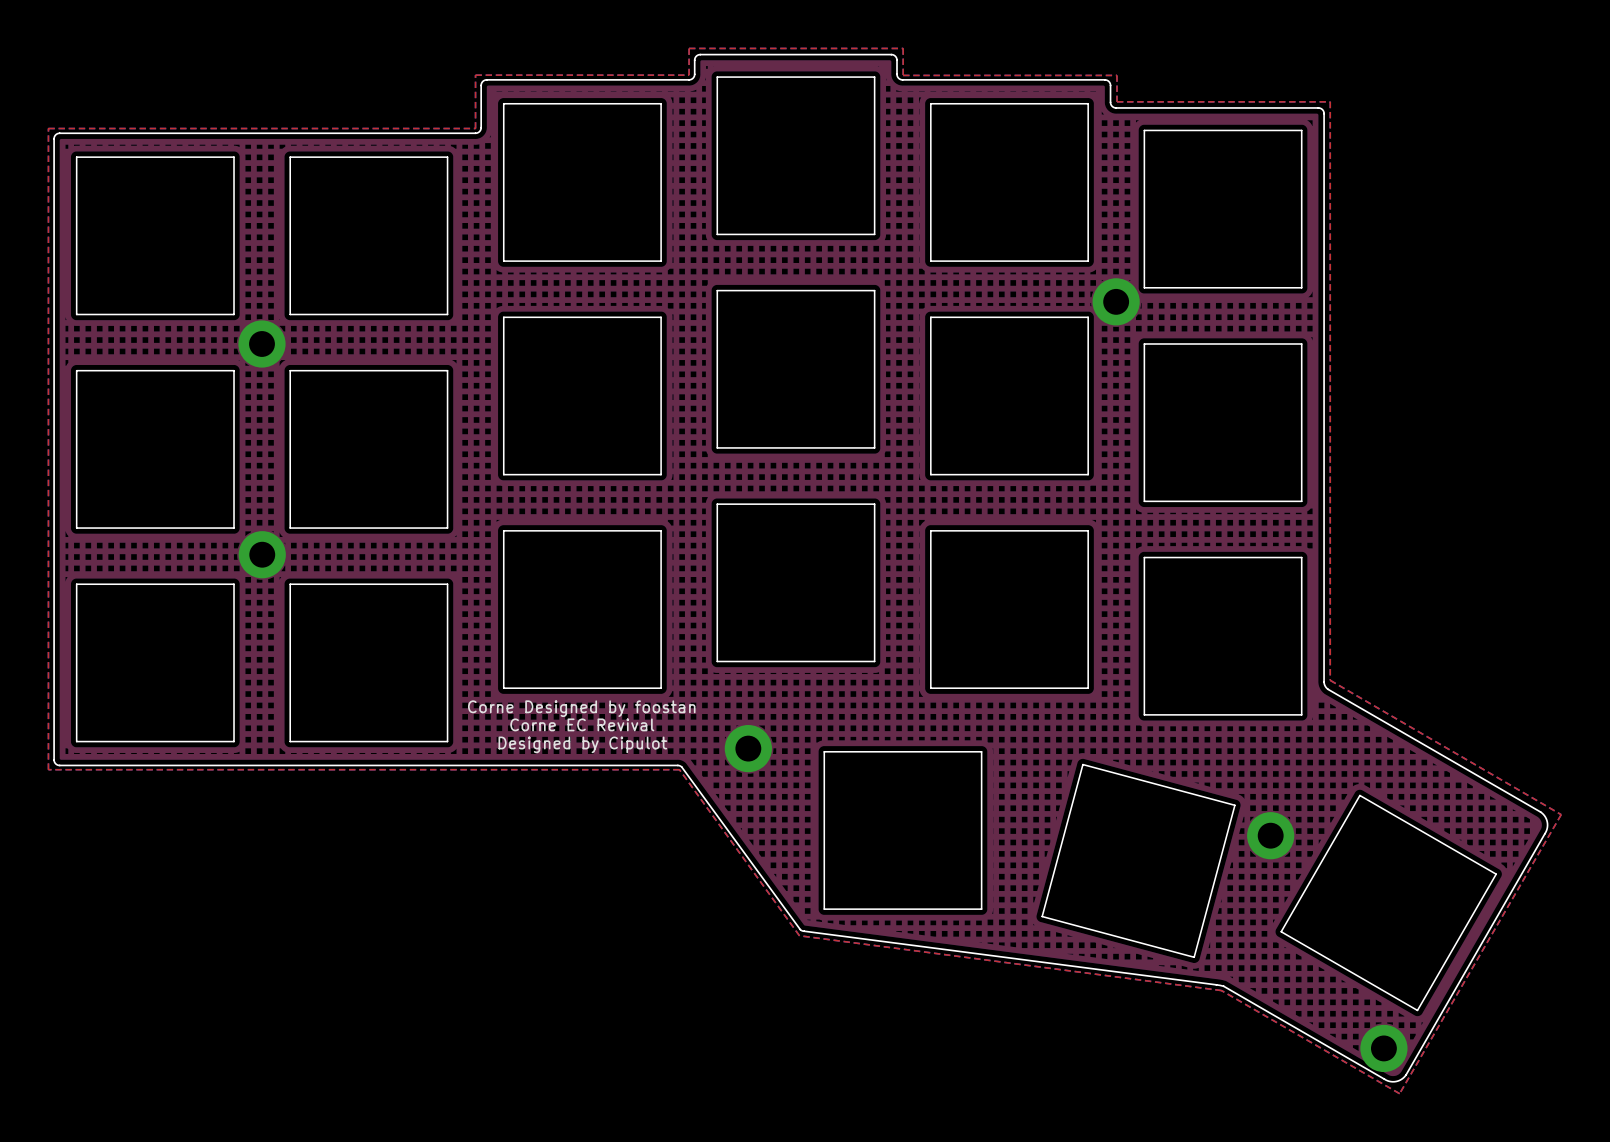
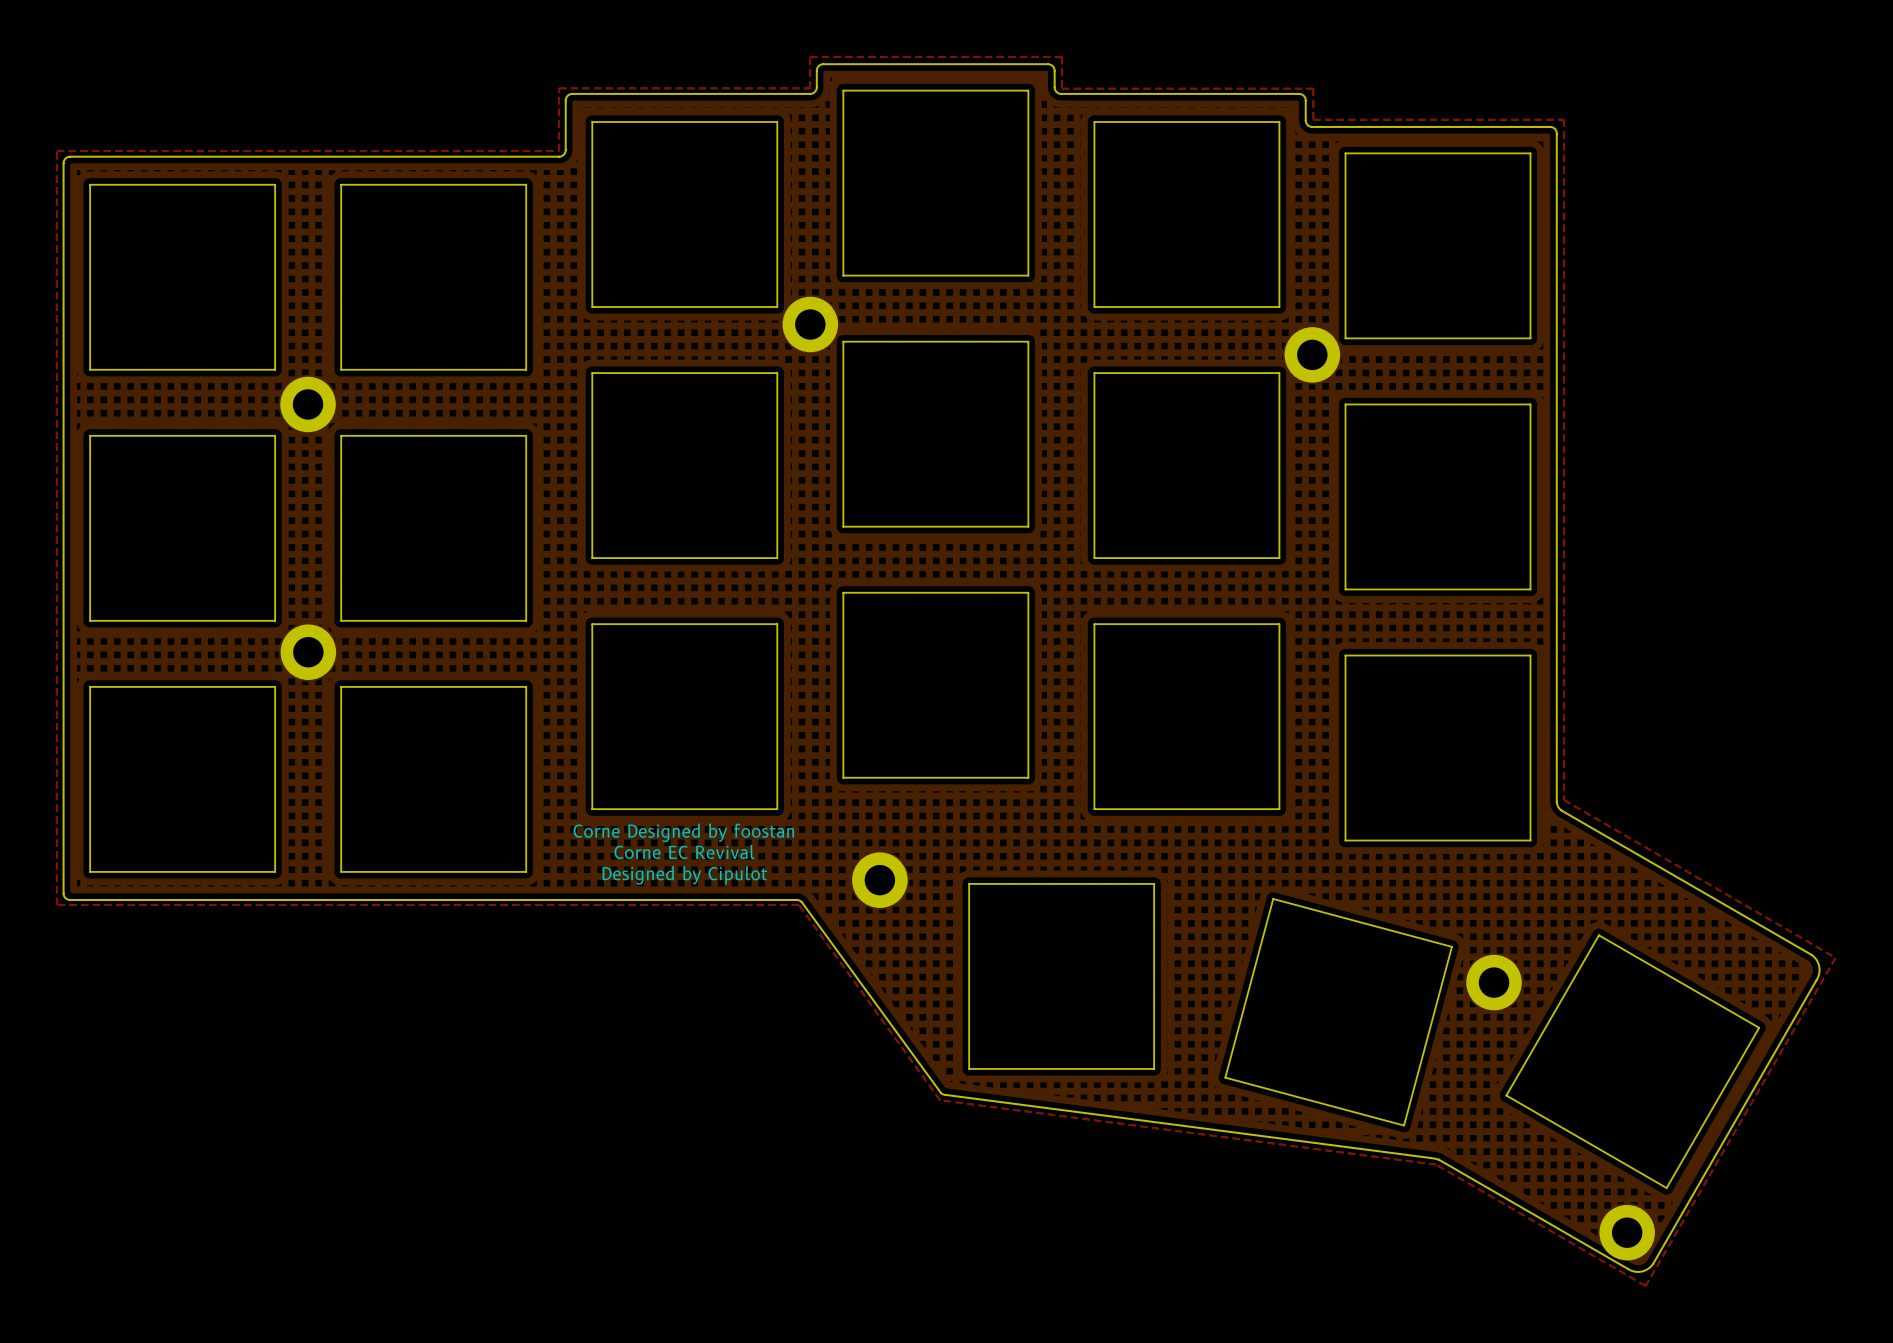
part: none -> (810, 324)

